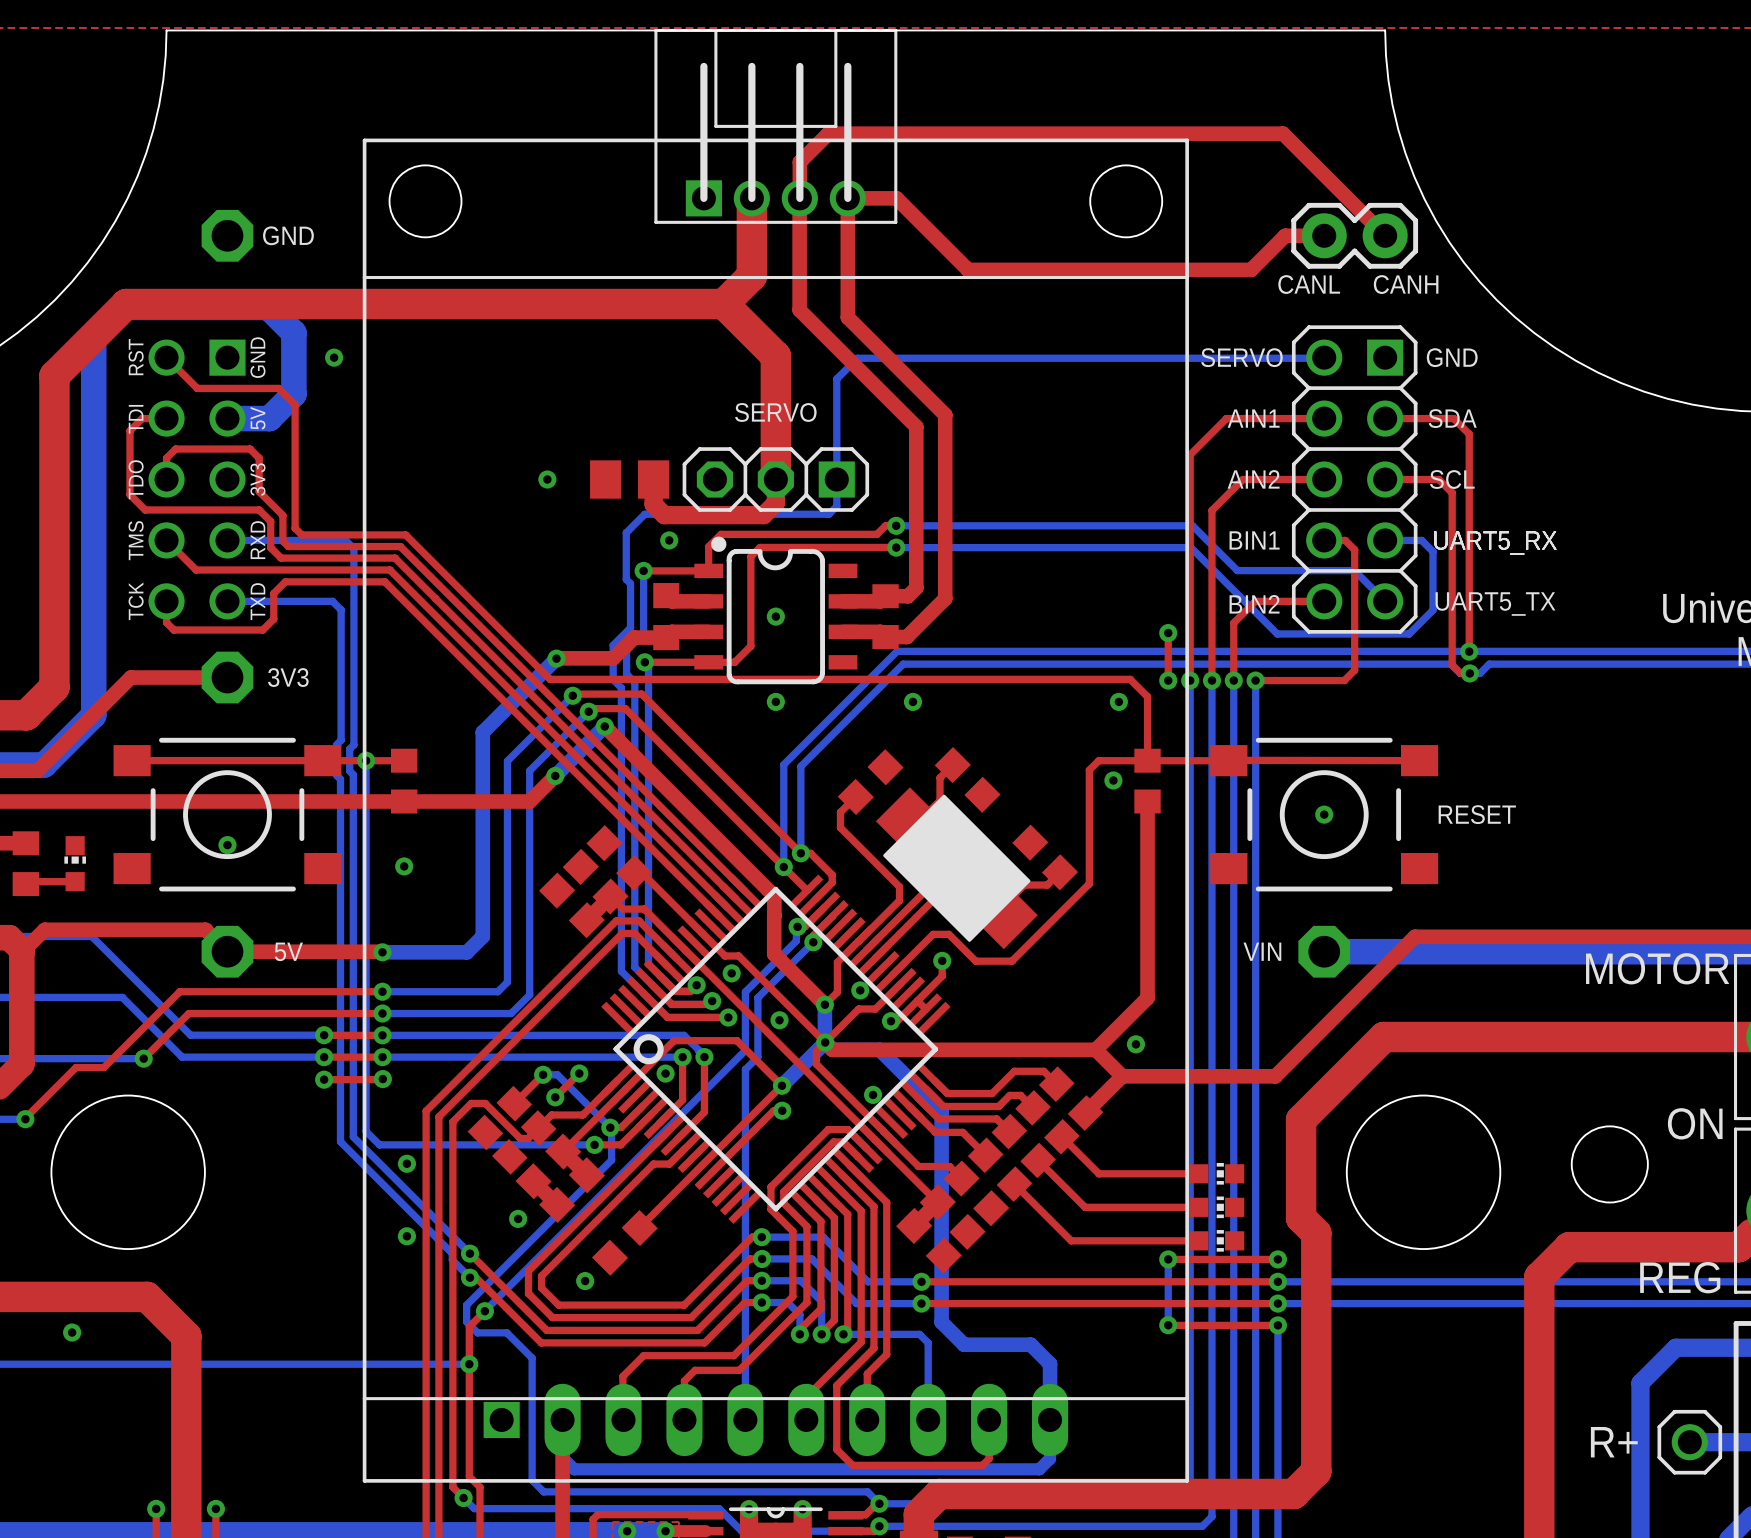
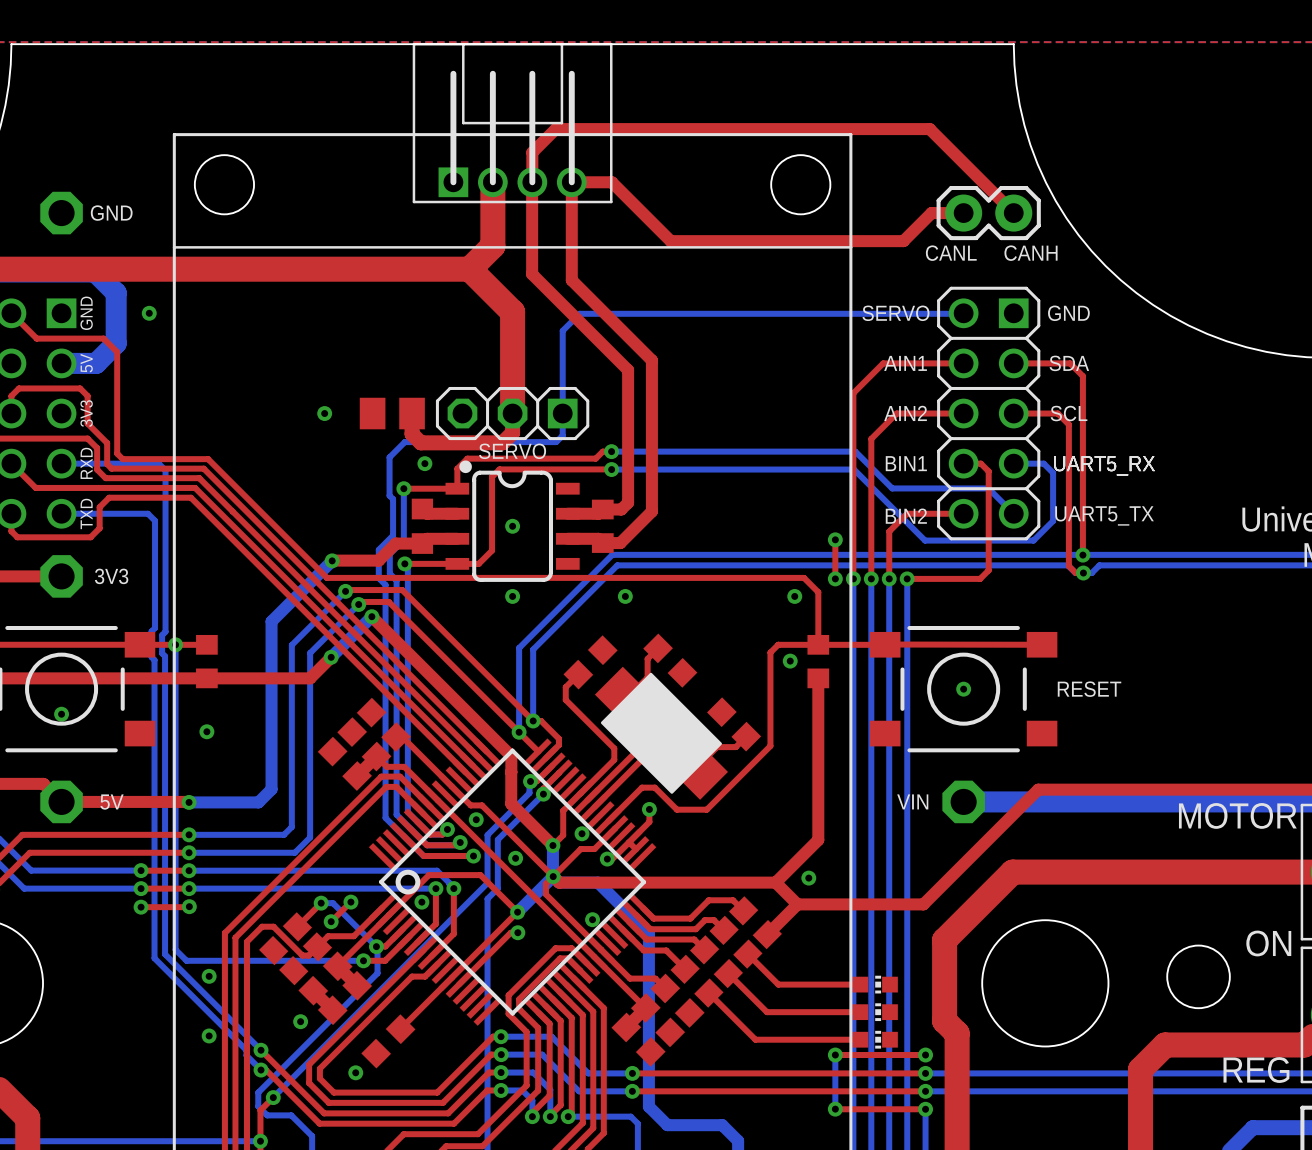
SERVO name position: SERVO (775, 412) -> SERVO (512, 451)

